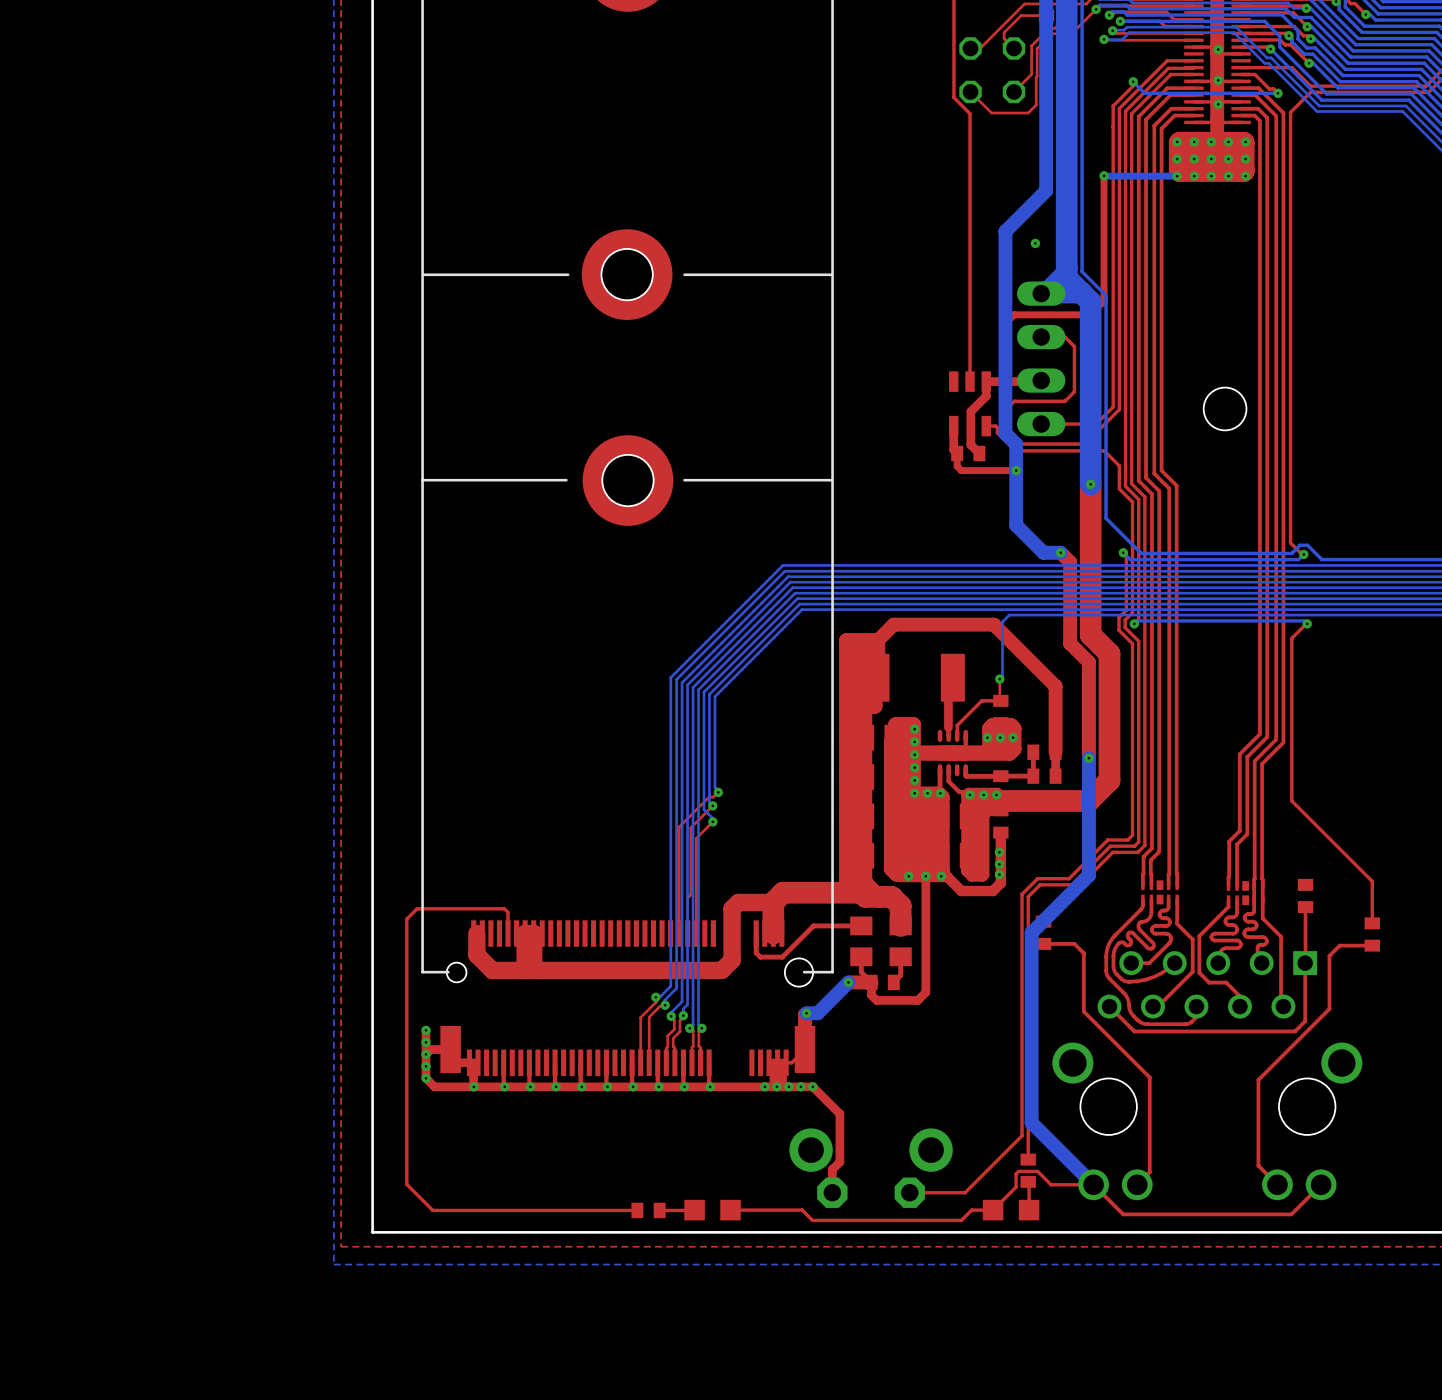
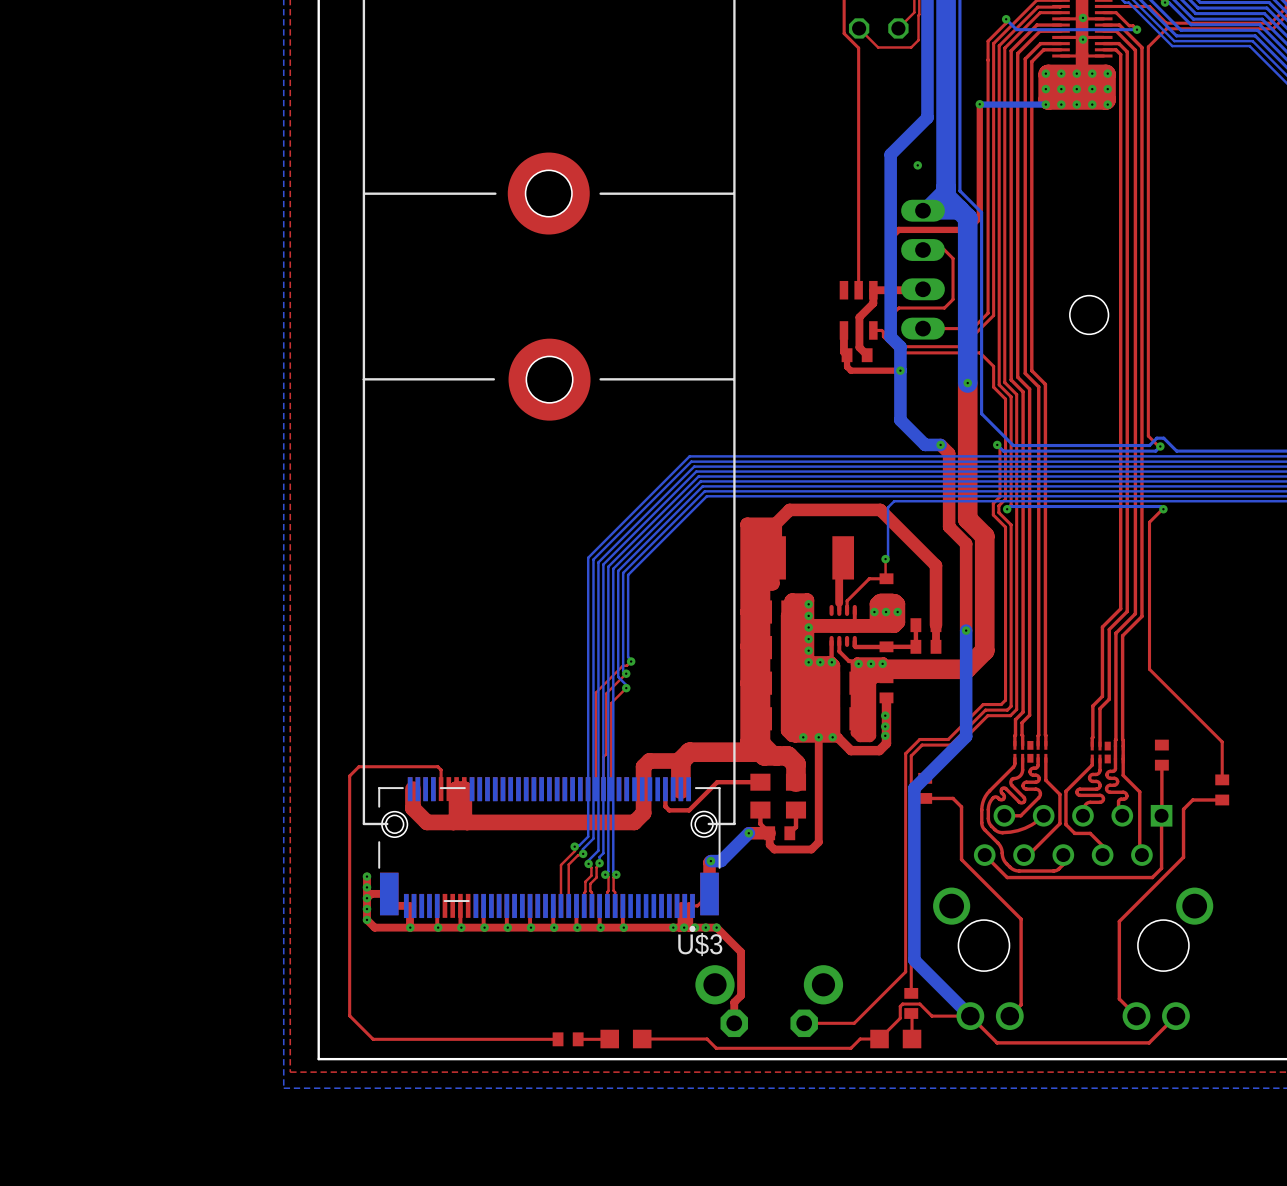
U$3: none -> (549, 854)

